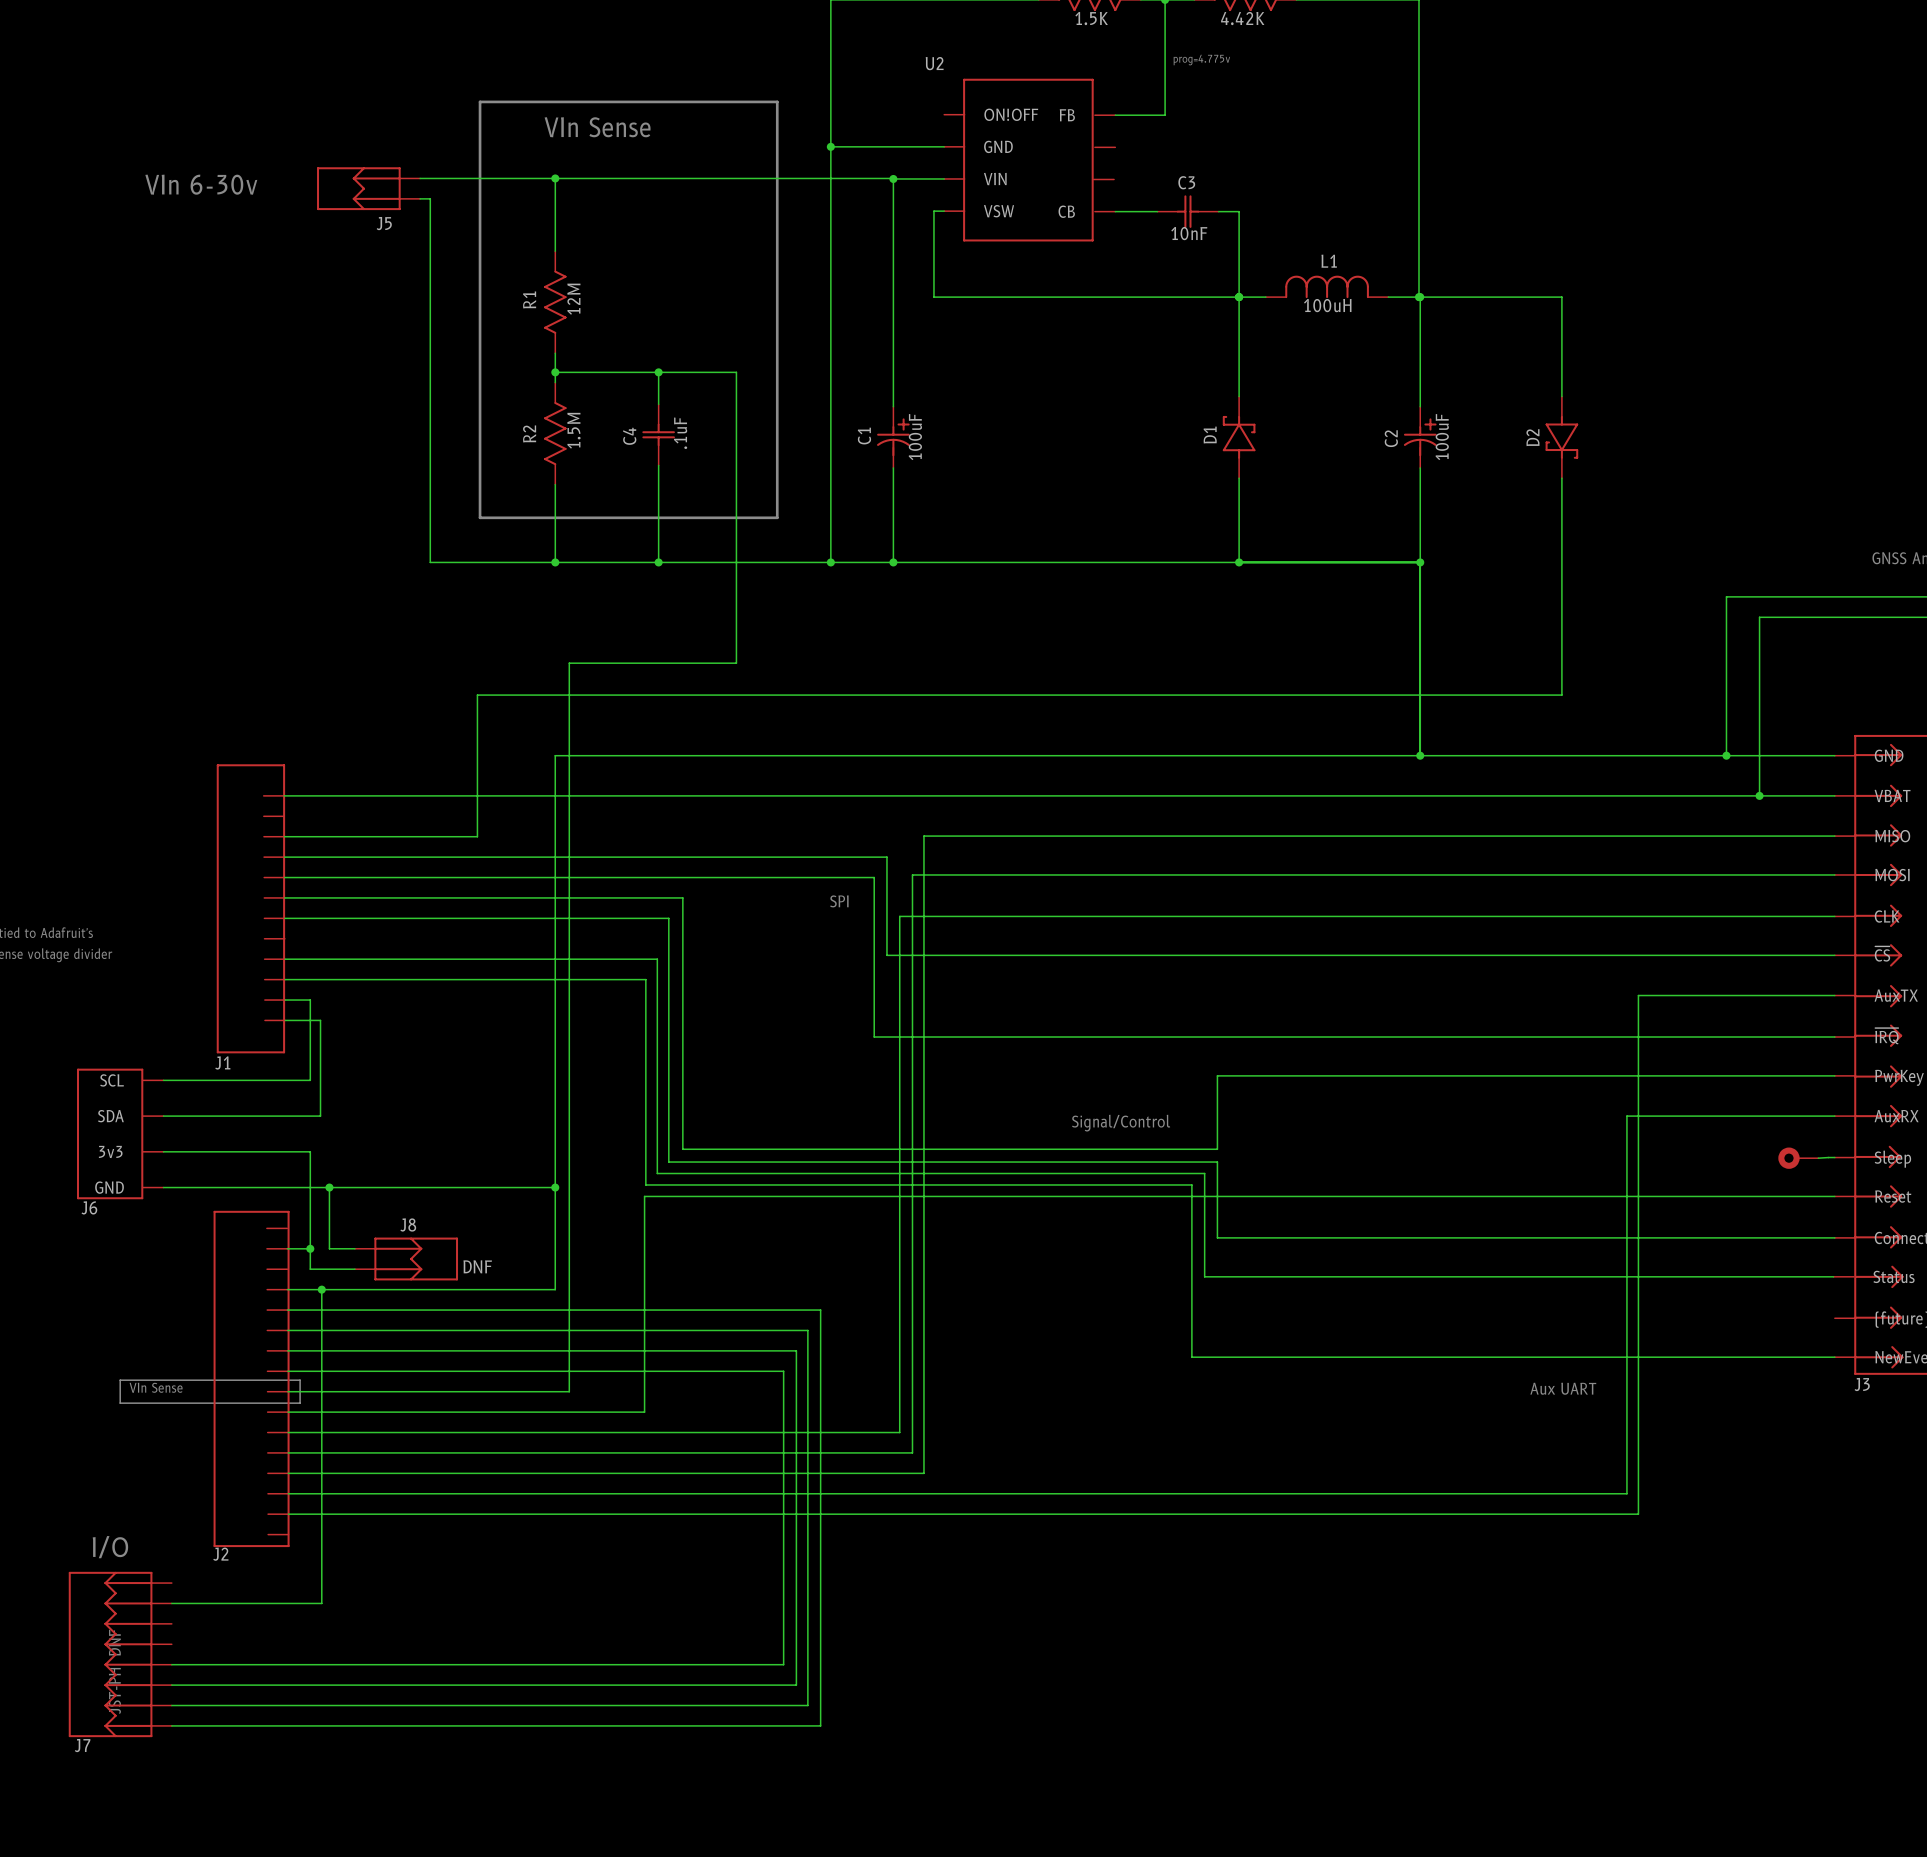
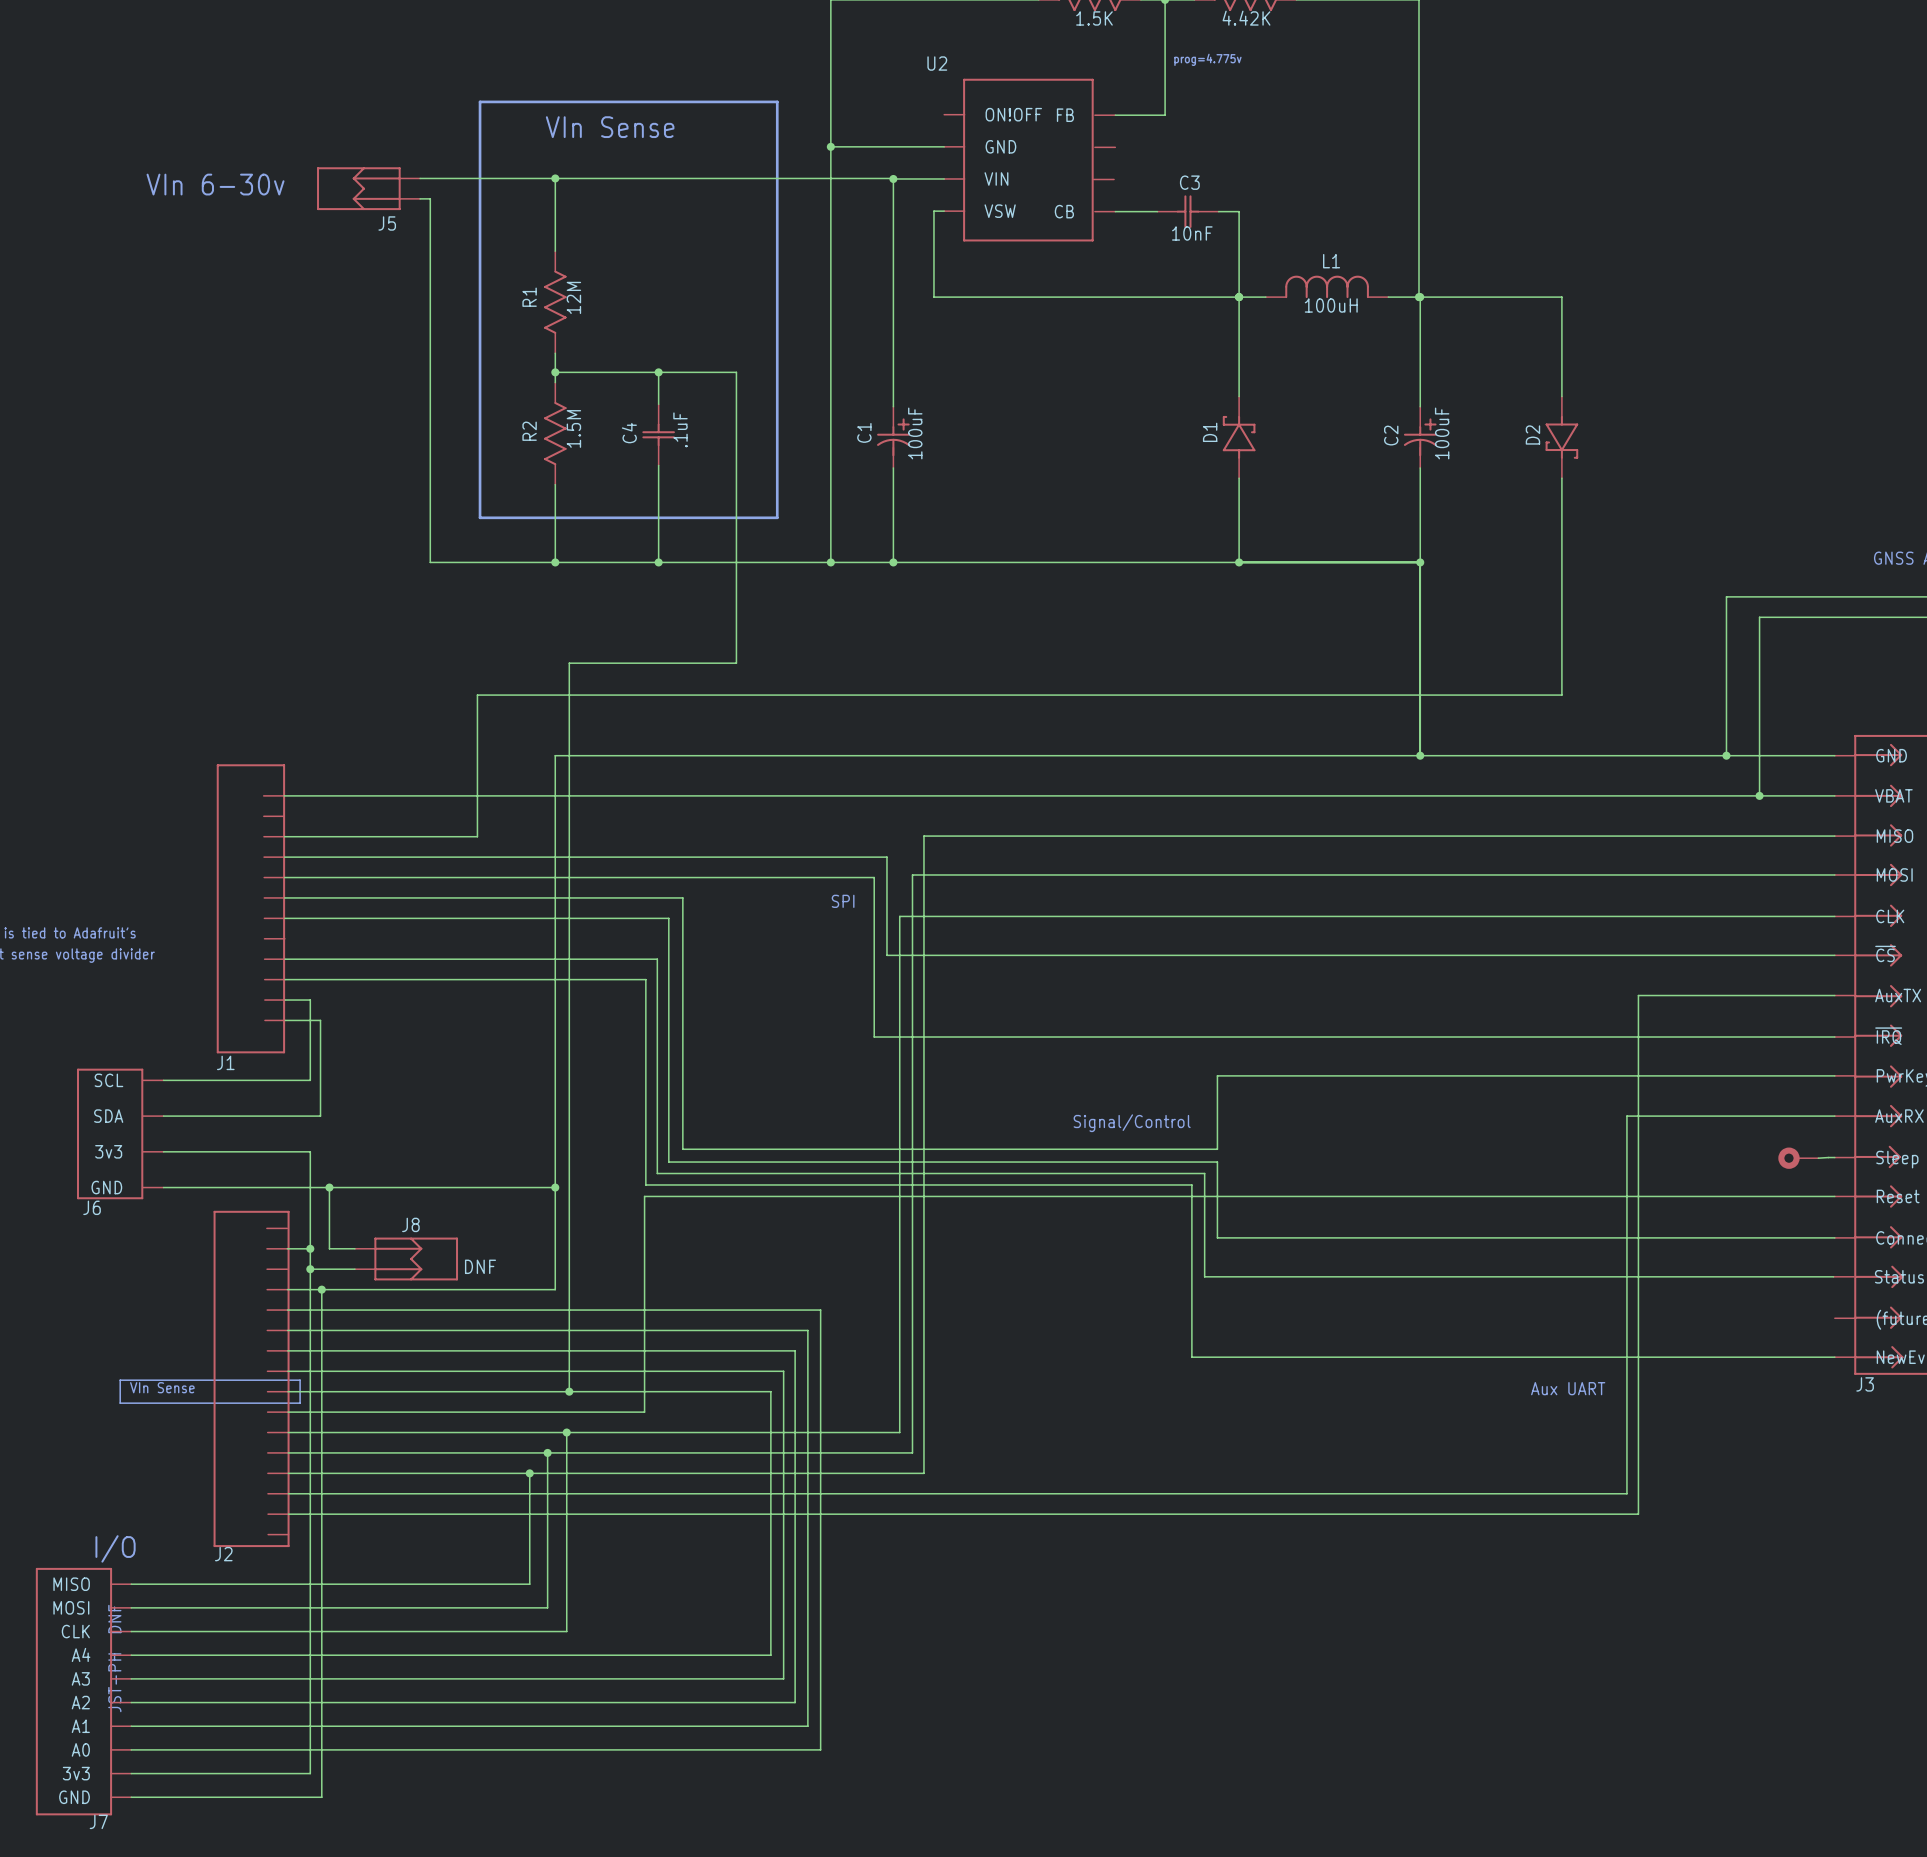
wire: none -> (310, 1269) (310, 1773) (131, 1773)
junction: none -> (310, 1269)
wire: (795, 1350) (796, 1685) (171, 1685) -> (795, 1350) (795, 1702) (131, 1702)
wire: none -> (569, 1391) (770, 1391) (770, 1655) (131, 1655)
junction: none -> (569, 1391)
wire: none -> (566, 1432) (566, 1631) (131, 1631)
junction: none -> (566, 1432)
wire: none -> (547, 1452) (547, 1607) (131, 1607)
junction: none -> (547, 1452)
wire: none -> (529, 1473) (529, 1584) (131, 1584)
junction: none -> (529, 1473)
J7 symbol: [68, 1571, 172, 1738] -> [35, 1567, 132, 1816]
wire: (171, 1603) (321, 1603) -> (131, 1797) (321, 1797) (321, 1603)
wire: (171, 1664) (783, 1664) -> (131, 1678) (783, 1678) (783, 1664)
wire: (171, 1705) (807, 1705) -> (131, 1726) (807, 1726) (807, 1705)
wire: (171, 1725) (820, 1725) -> (131, 1749) (820, 1749) (820, 1725)
J7 name position: J7 (82, 1745) -> J7 (98, 1821)

